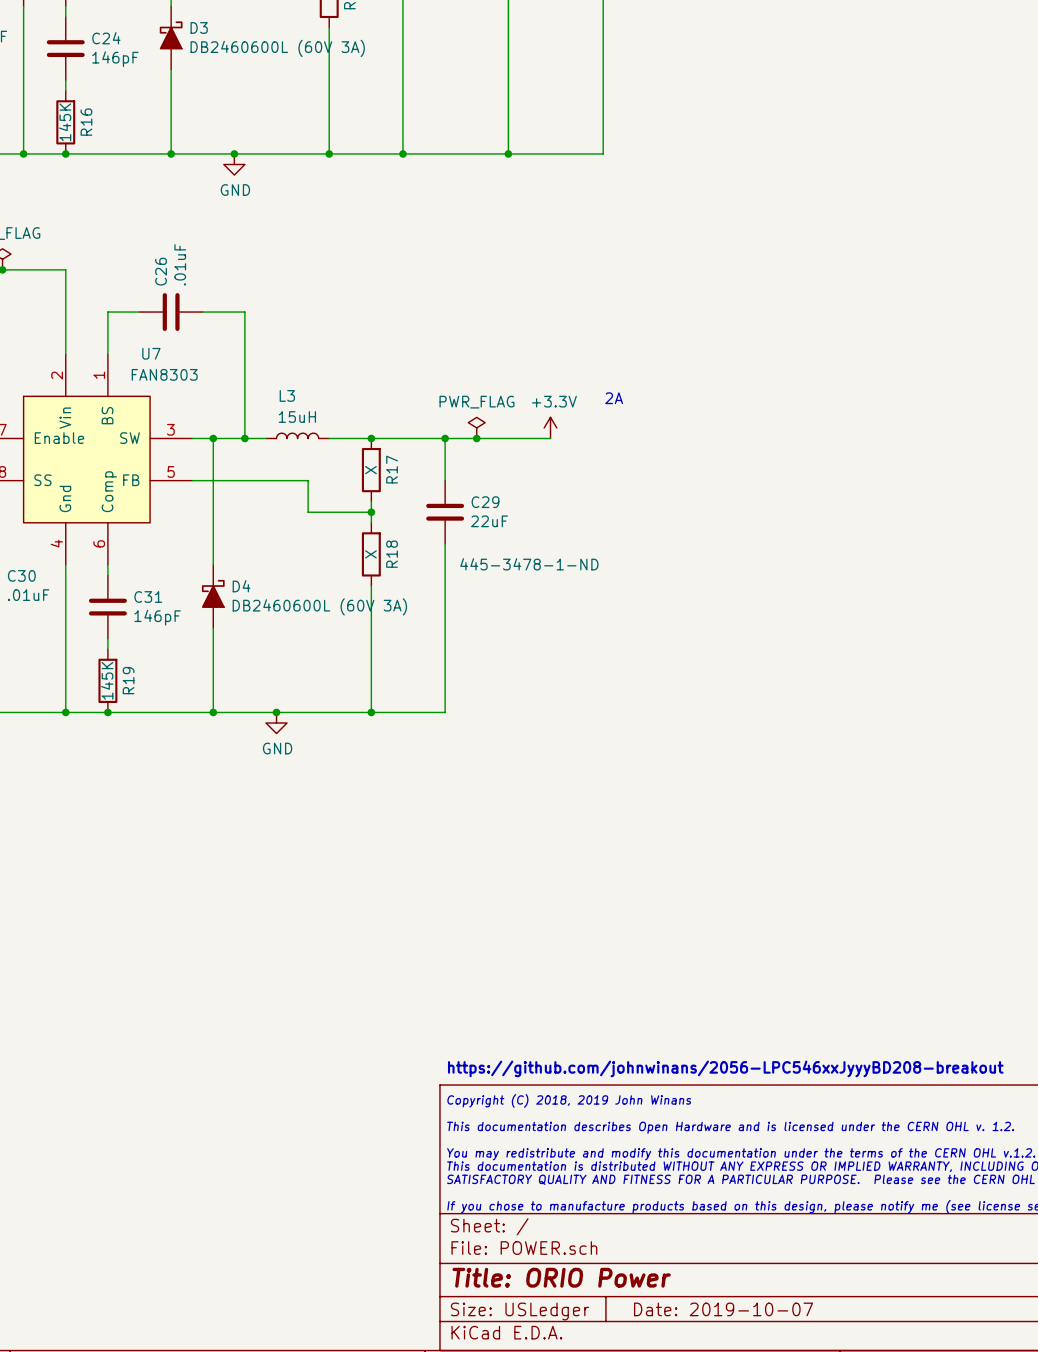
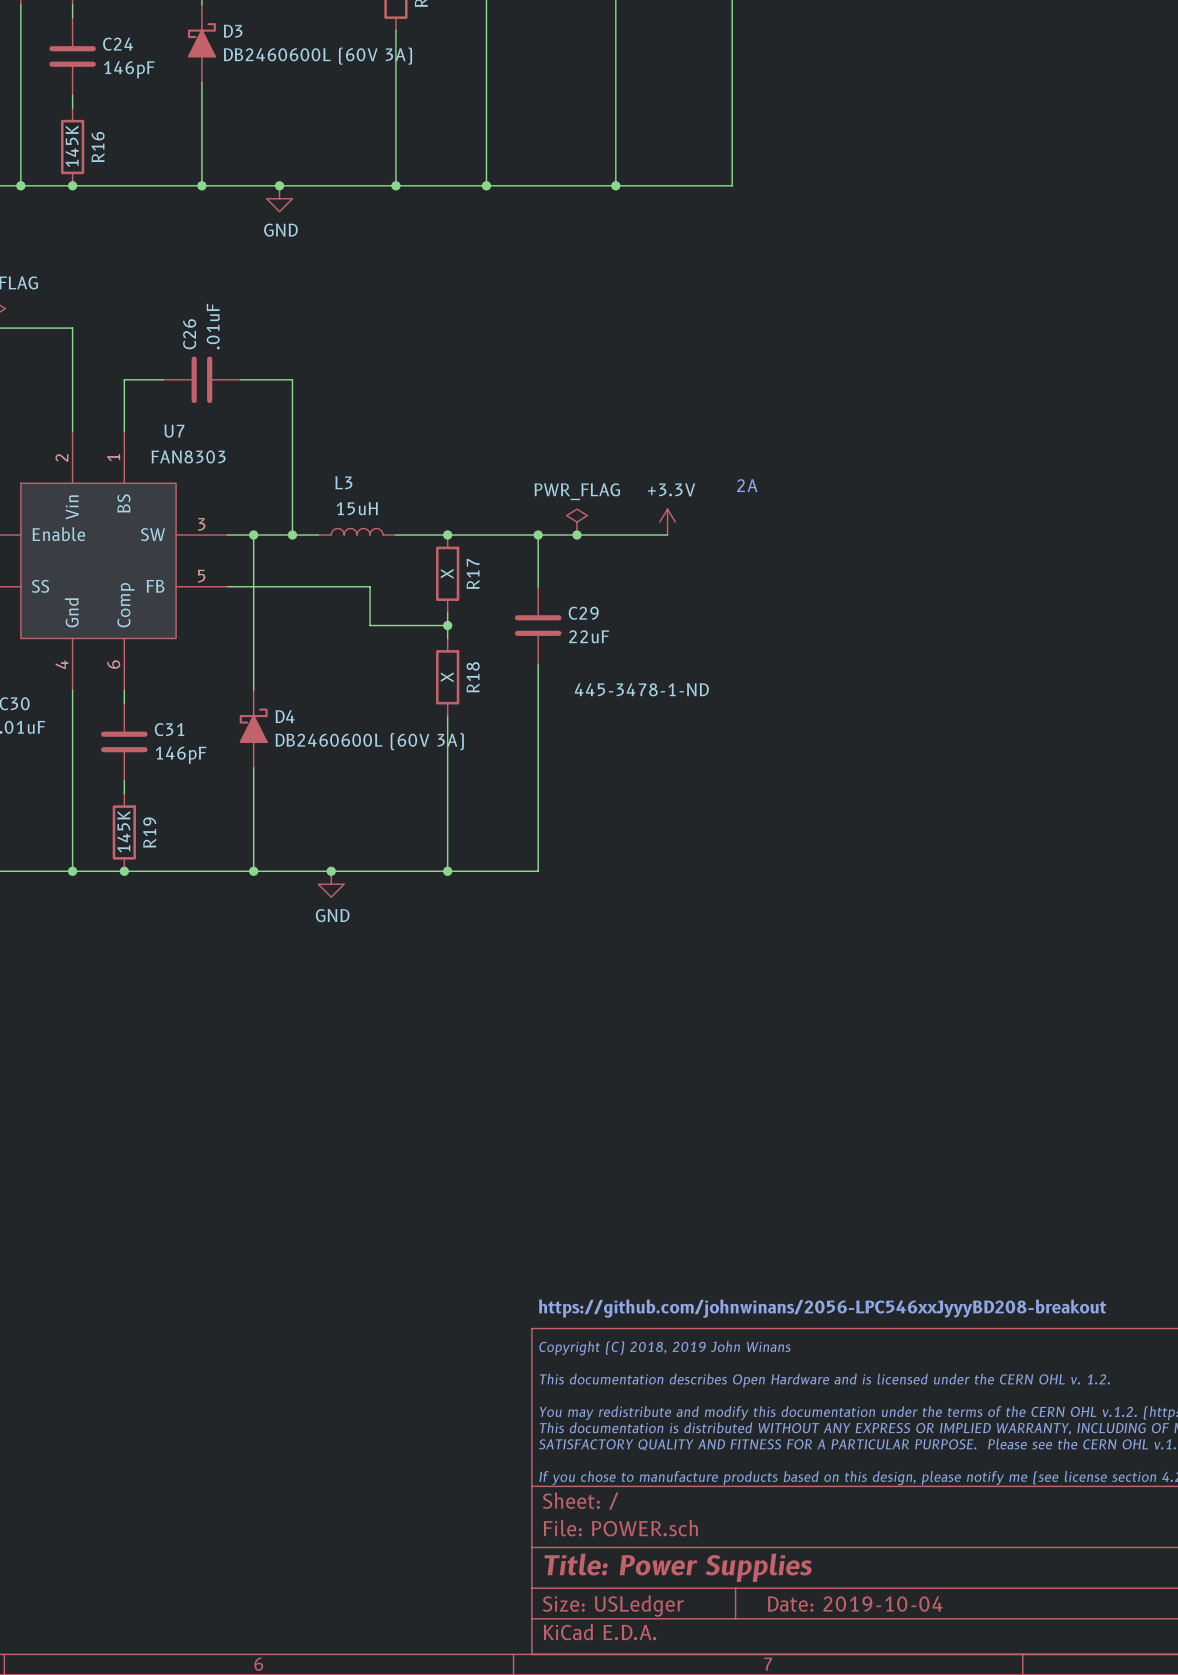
title block: Title: ORIO Power (561, 1277) -> Title: Power Supplies (678, 1567)
title block: Date: 2019-10-07 (723, 1309) -> Date: 2019-10-04 (855, 1604)

